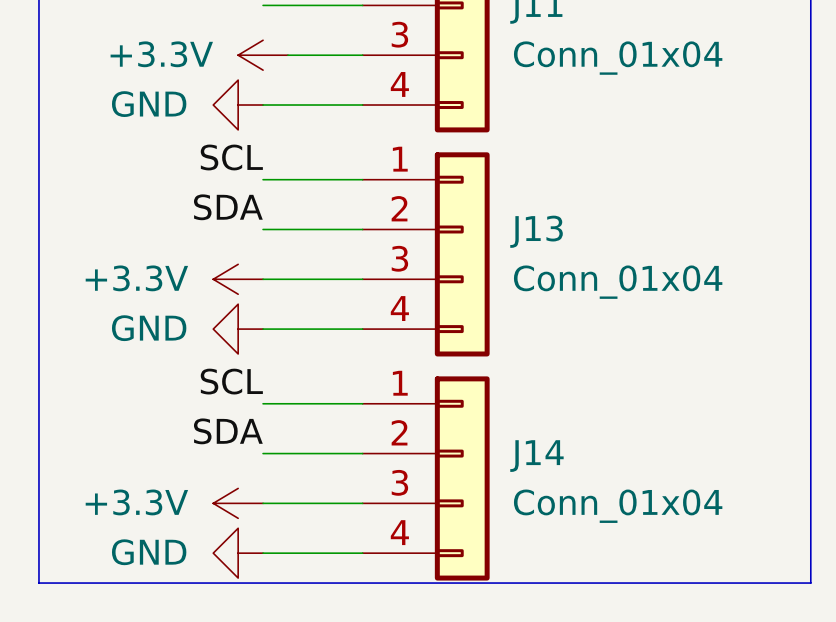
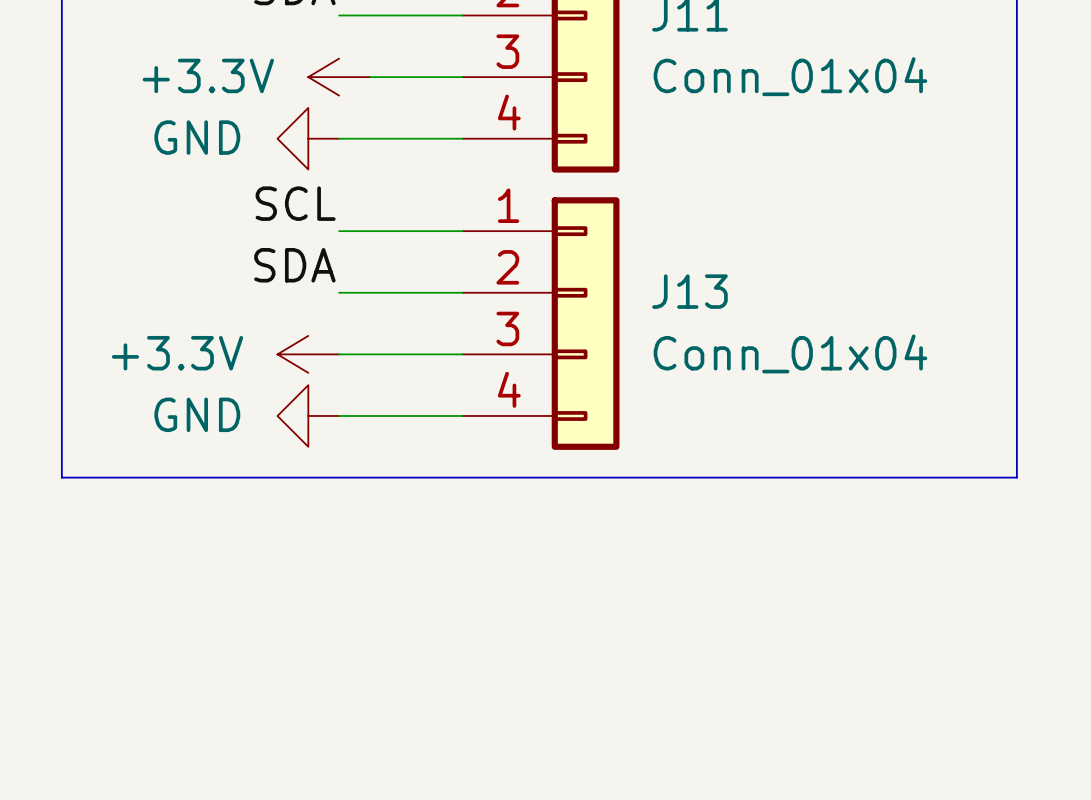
line: (38, 378) (38, 583) (810, 583) (810, 378) -> (61, 477) (1016, 477)
label: SCL (231, 381) -> none
wire: (263, 403) (362, 403) -> none
label: SDA (228, 431) -> none
wire: (263, 453) (362, 453) -> none
J14: Conn_01x04 (426, 478) -> none
power symbol: +3.3V (238, 503) -> none
wire: (263, 503) (362, 503) -> none
power symbol: GND (238, 553) -> none
wire: (263, 553) (362, 553) -> none

